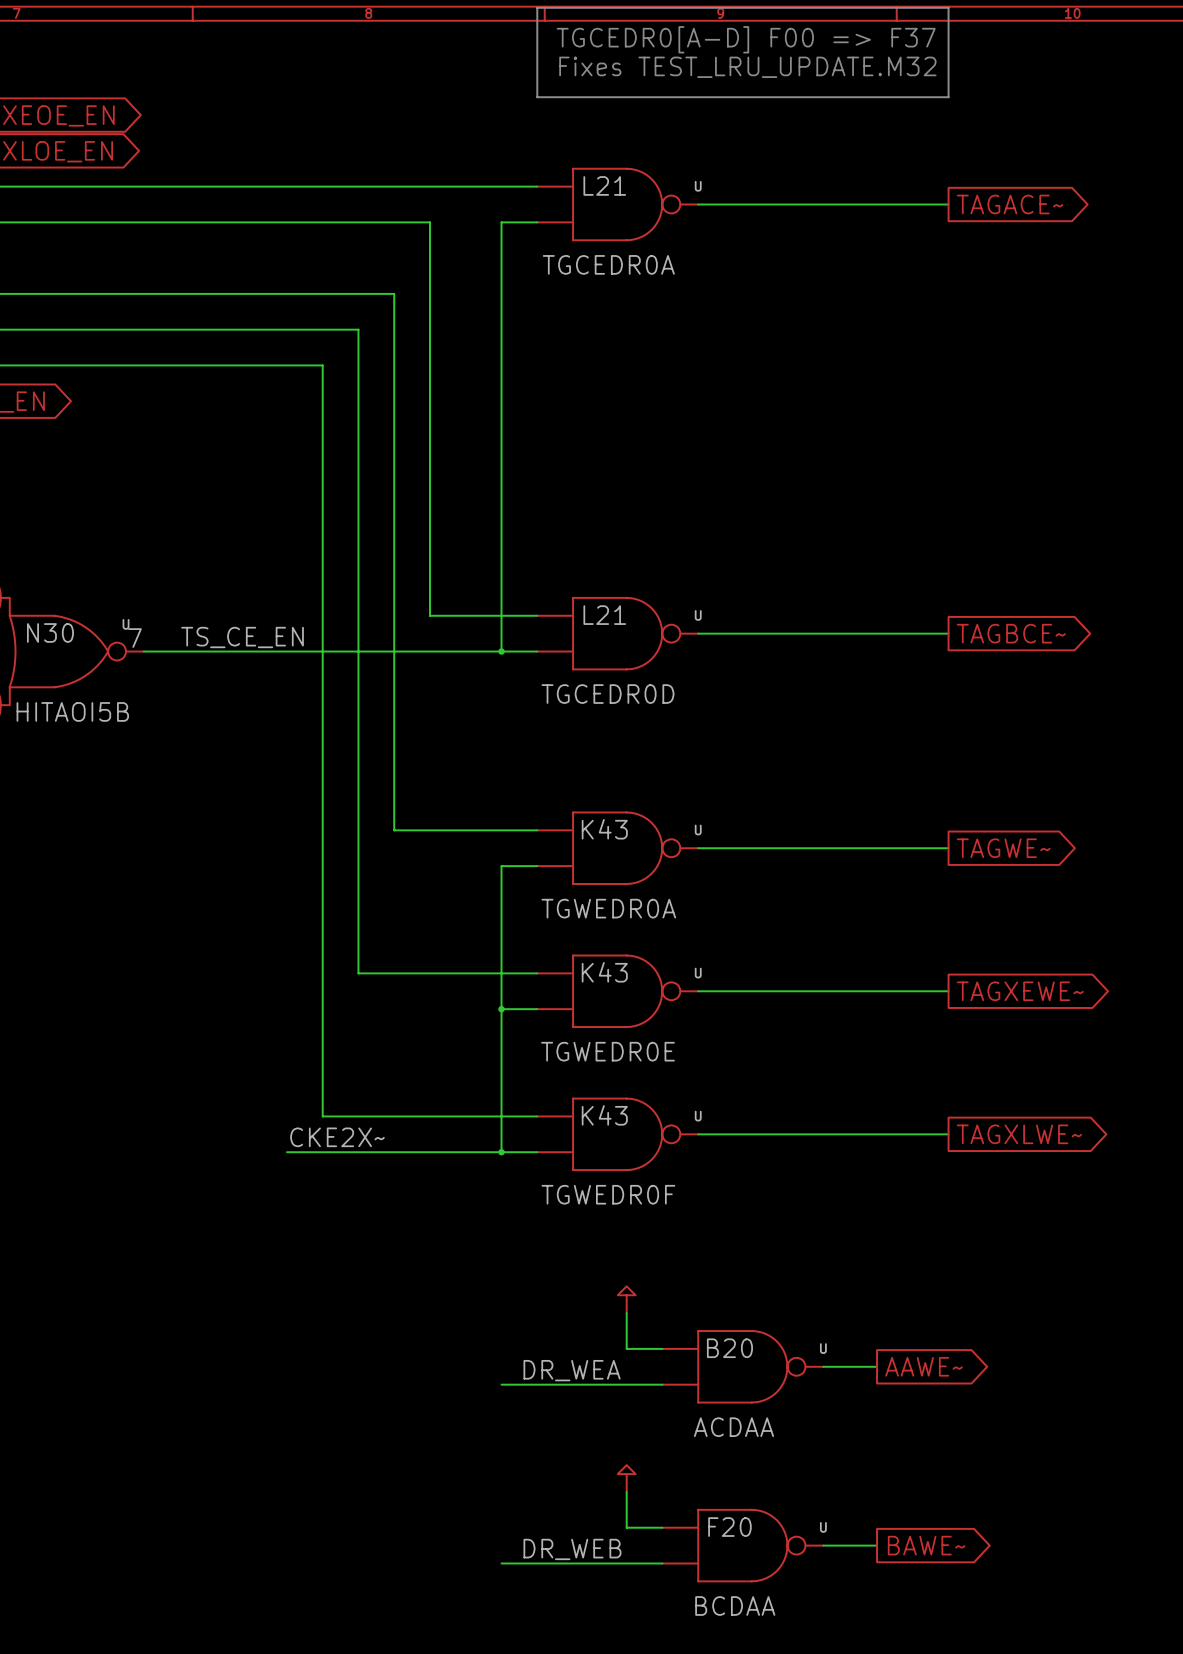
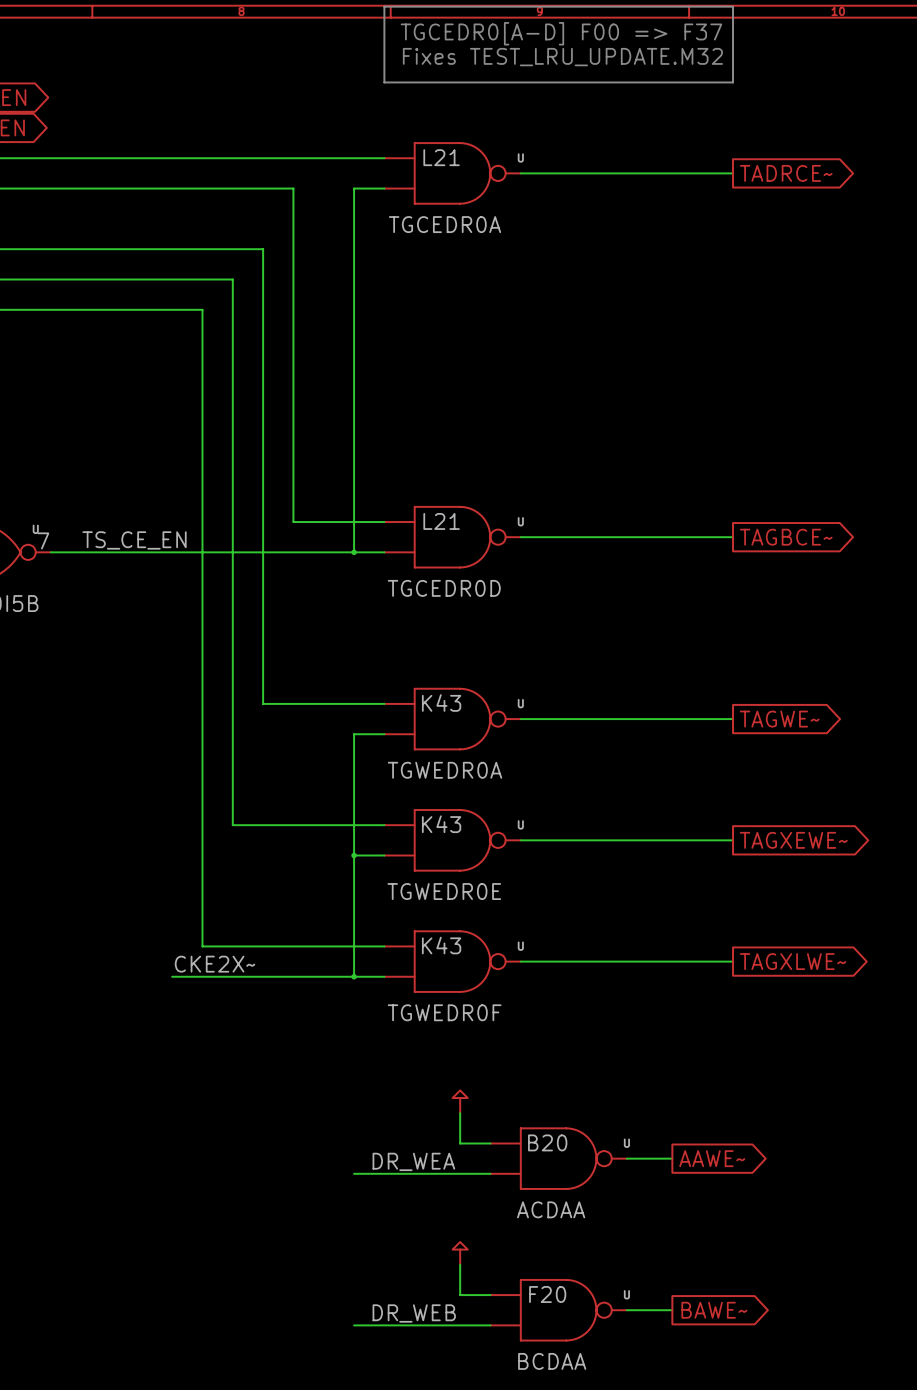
global label: TAGACE~ (1010, 204) -> TADRCE~ (786, 173)

